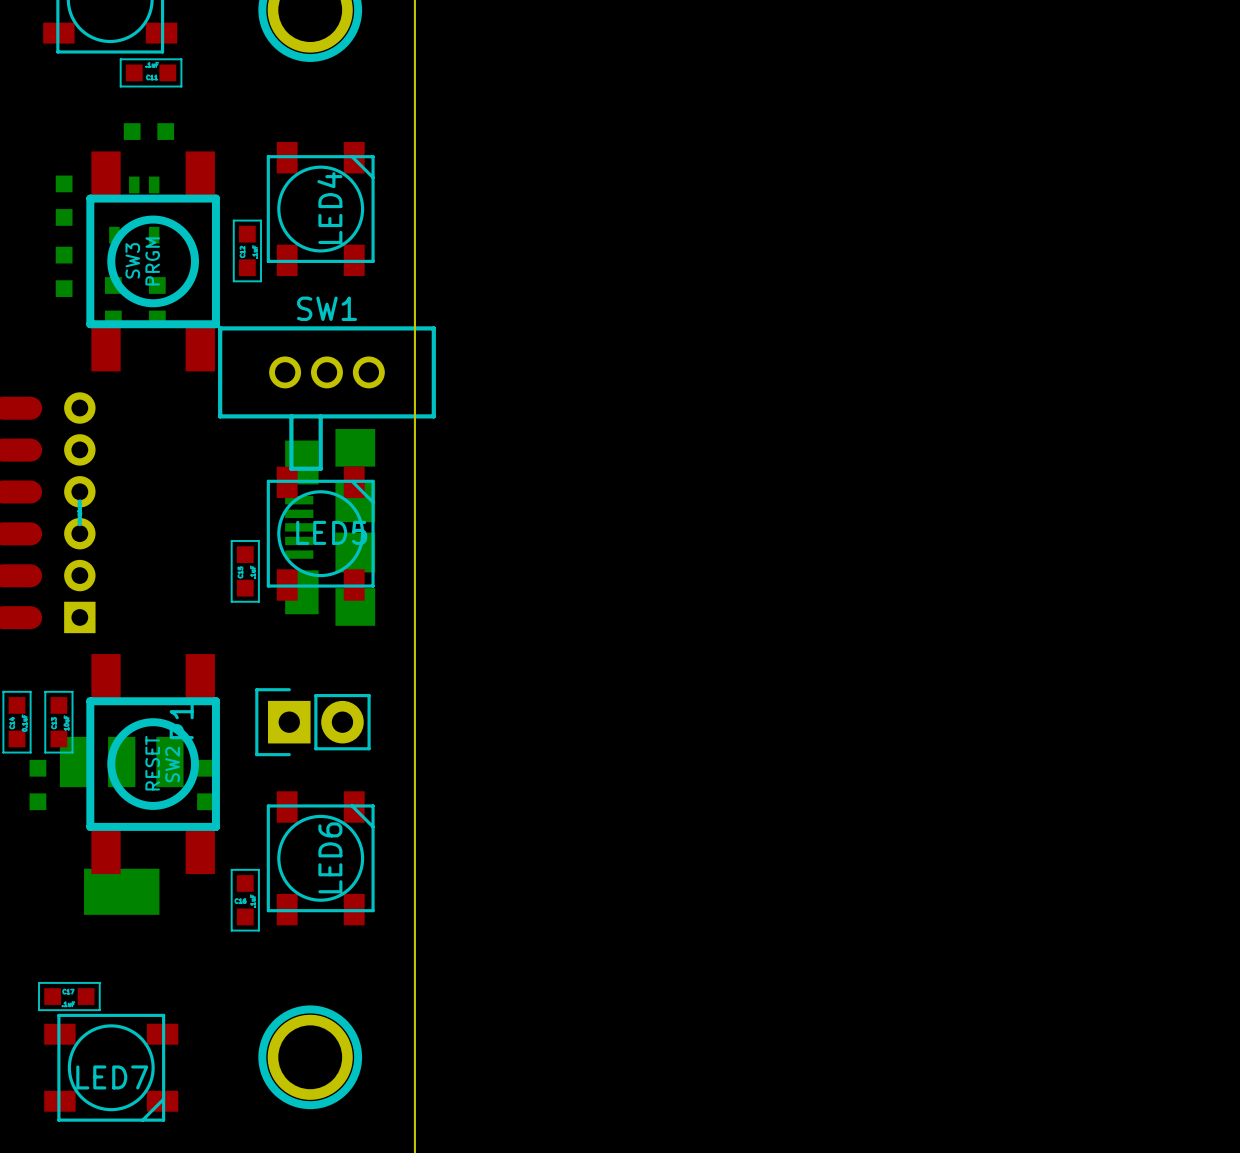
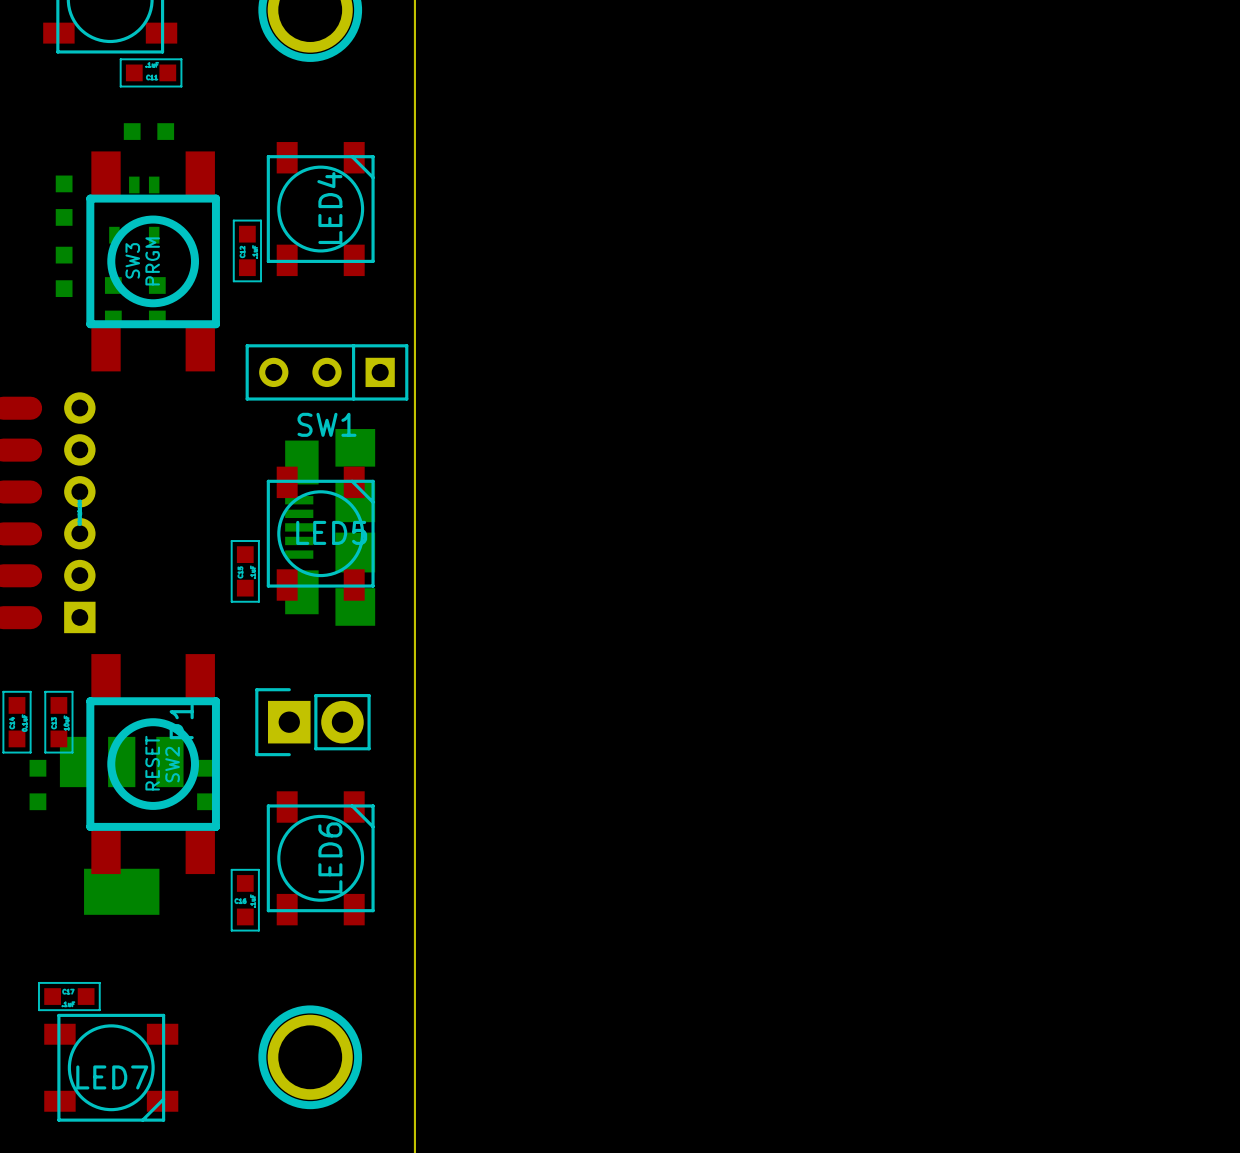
SW1 name position: SW1 (326, 308) -> SW1 (326, 424)
SW1 footprint: [218, 326, 436, 471] -> [245, 344, 409, 401]

